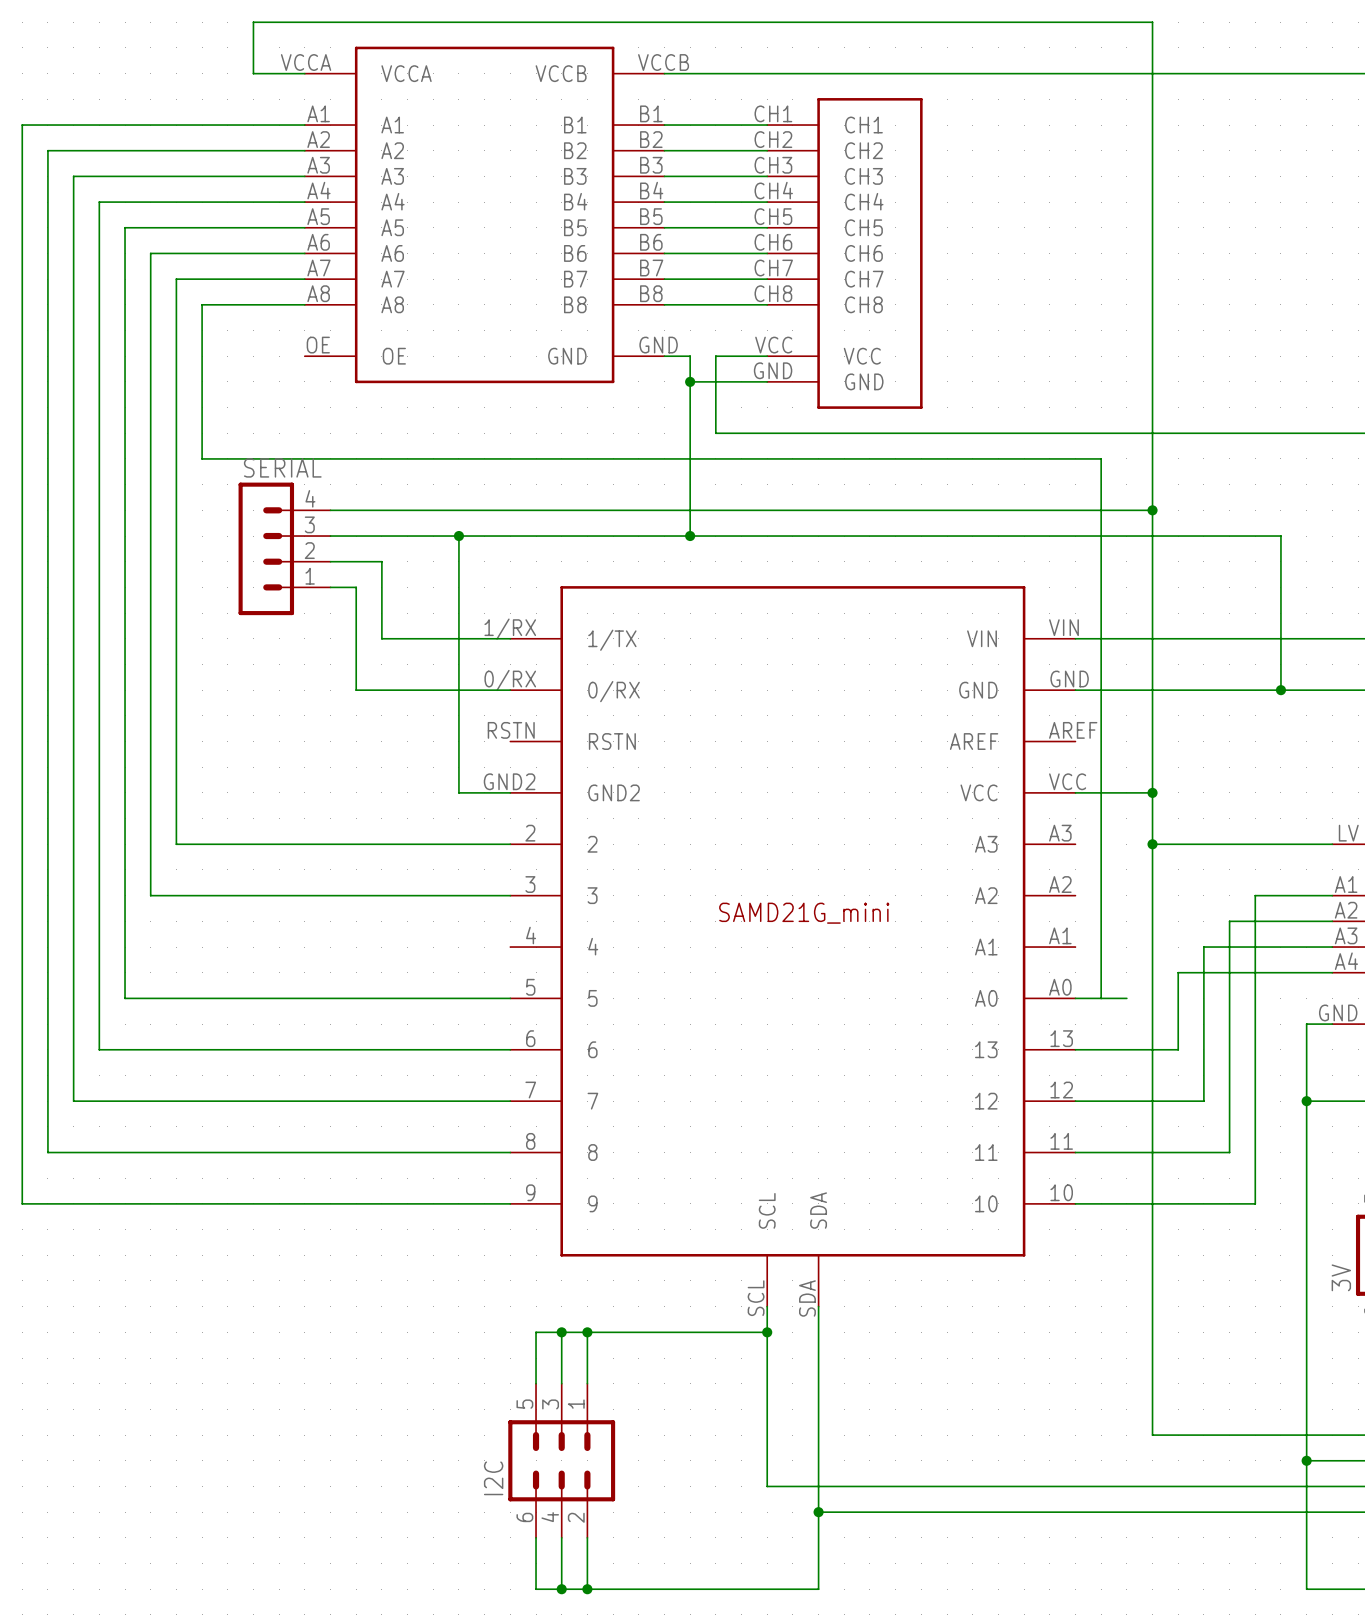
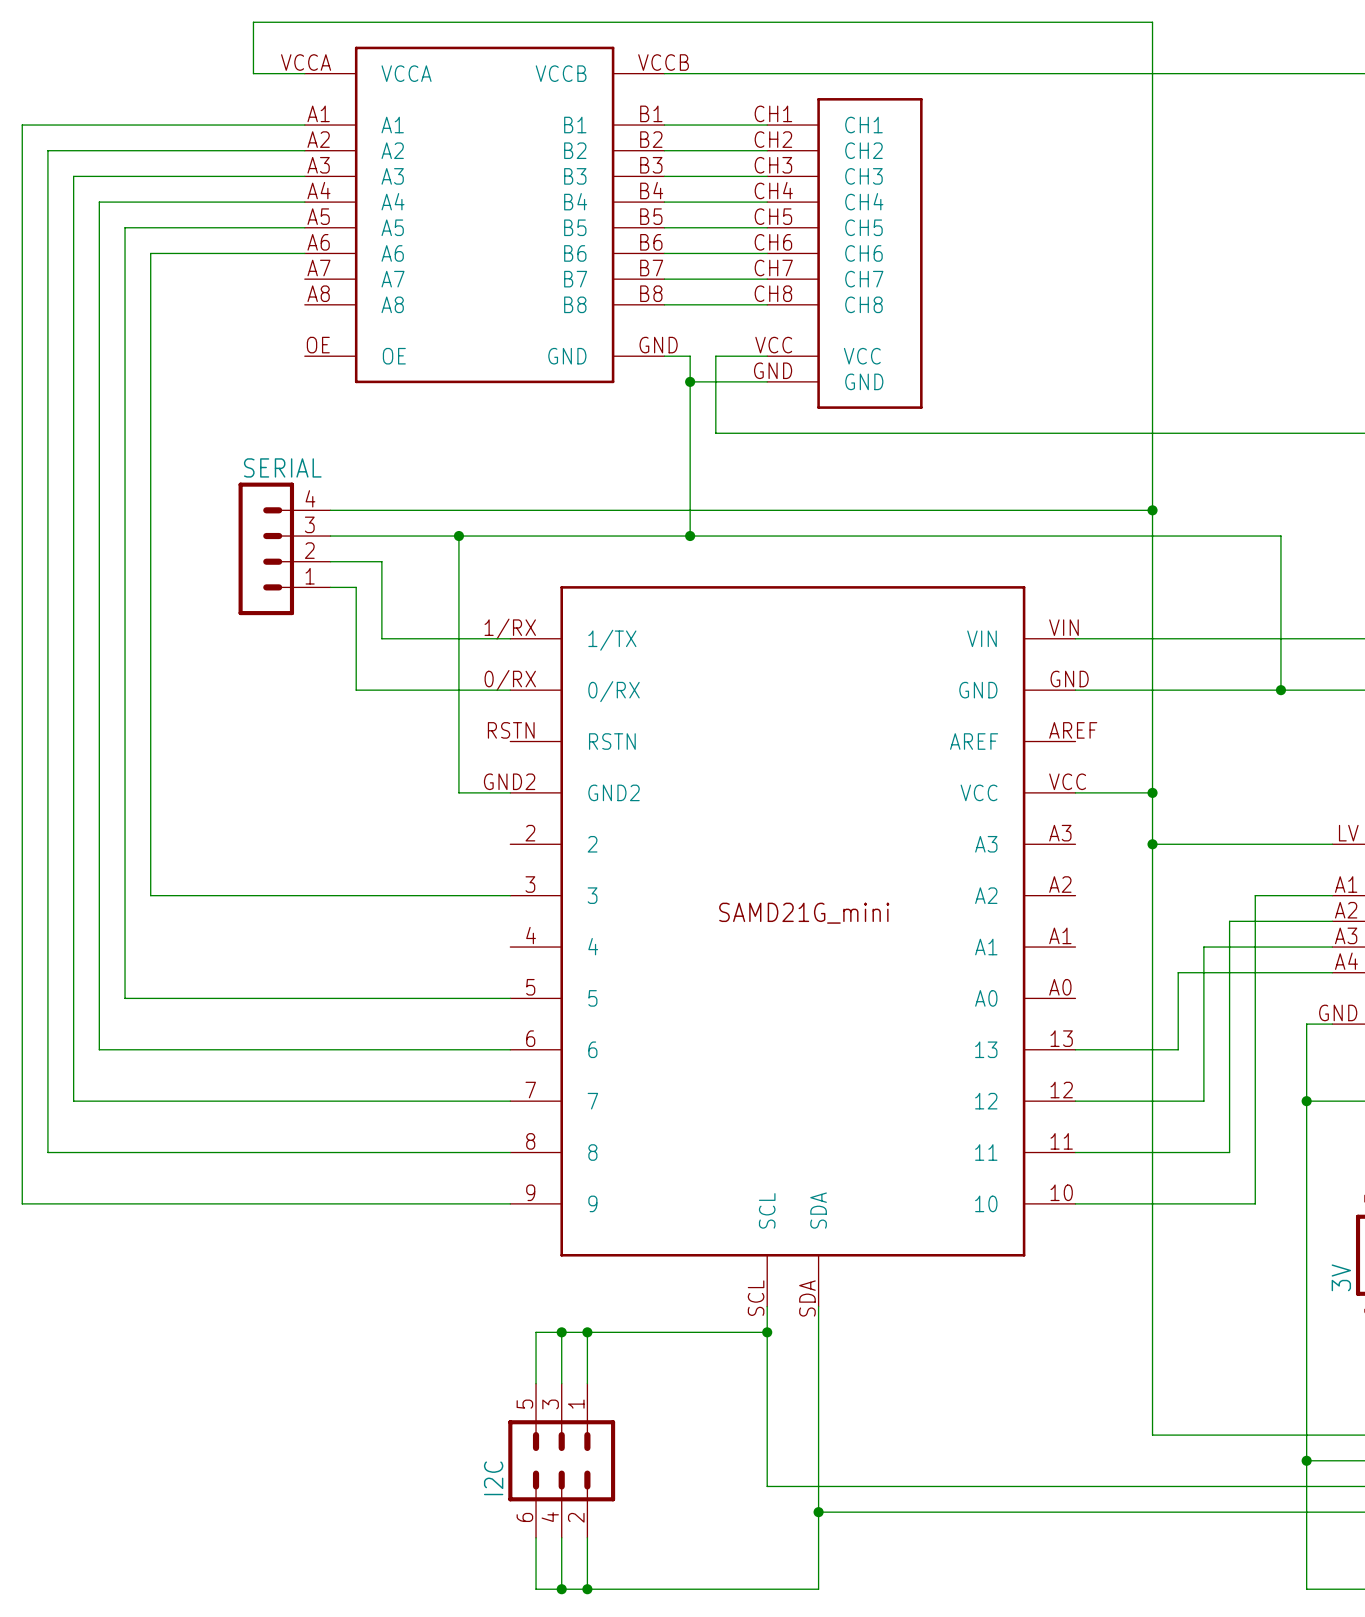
wire: (304, 279) (176, 279) (176, 844) (510, 844) -> none
wire: (304, 304) (202, 304) (202, 458) (1101, 458) (1101, 998) -> none
wire: (1075, 998) (1126, 998) -> none

